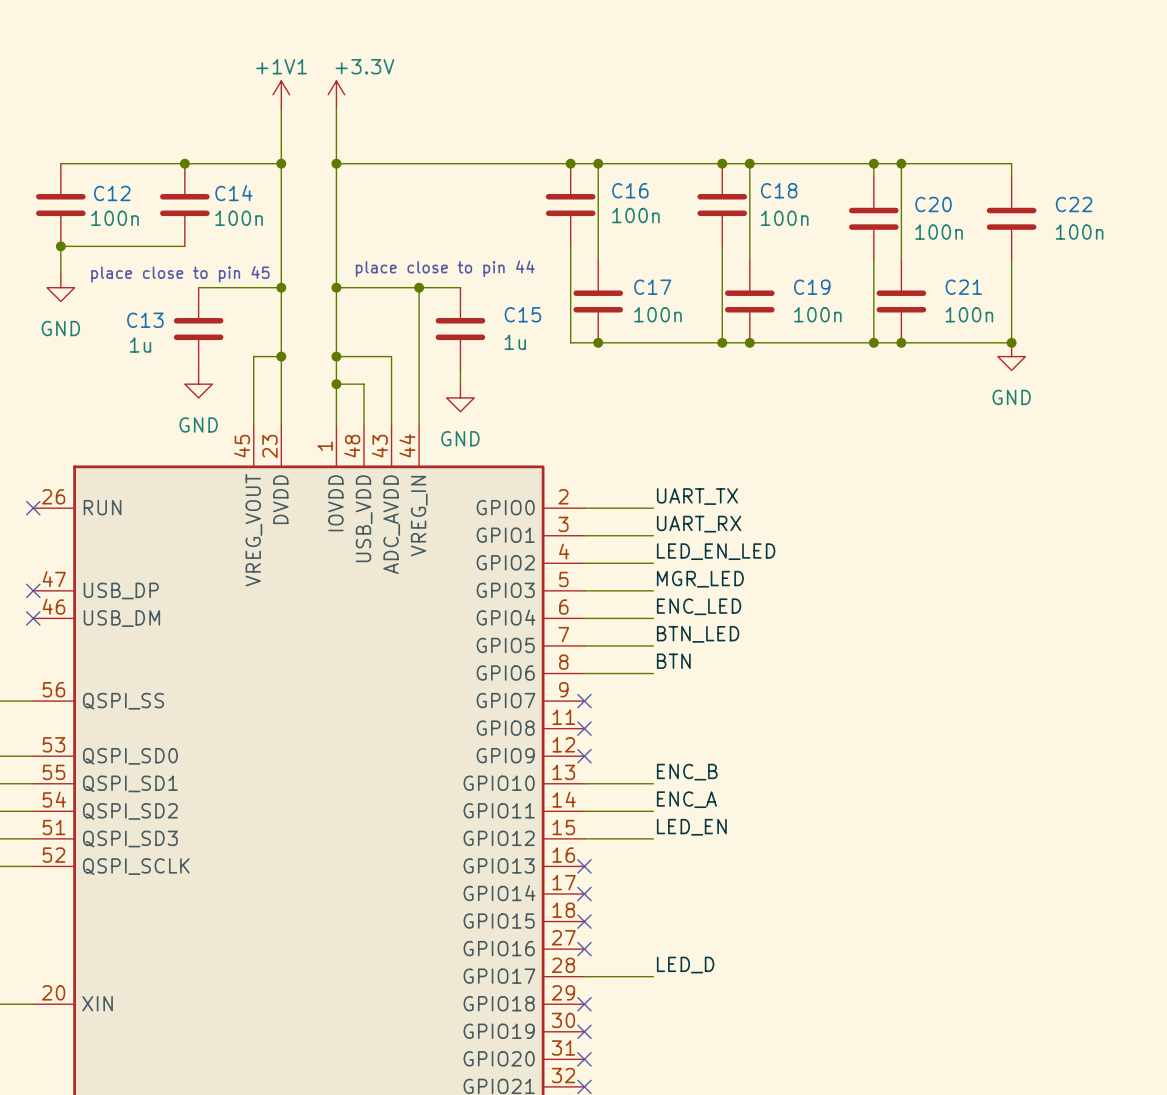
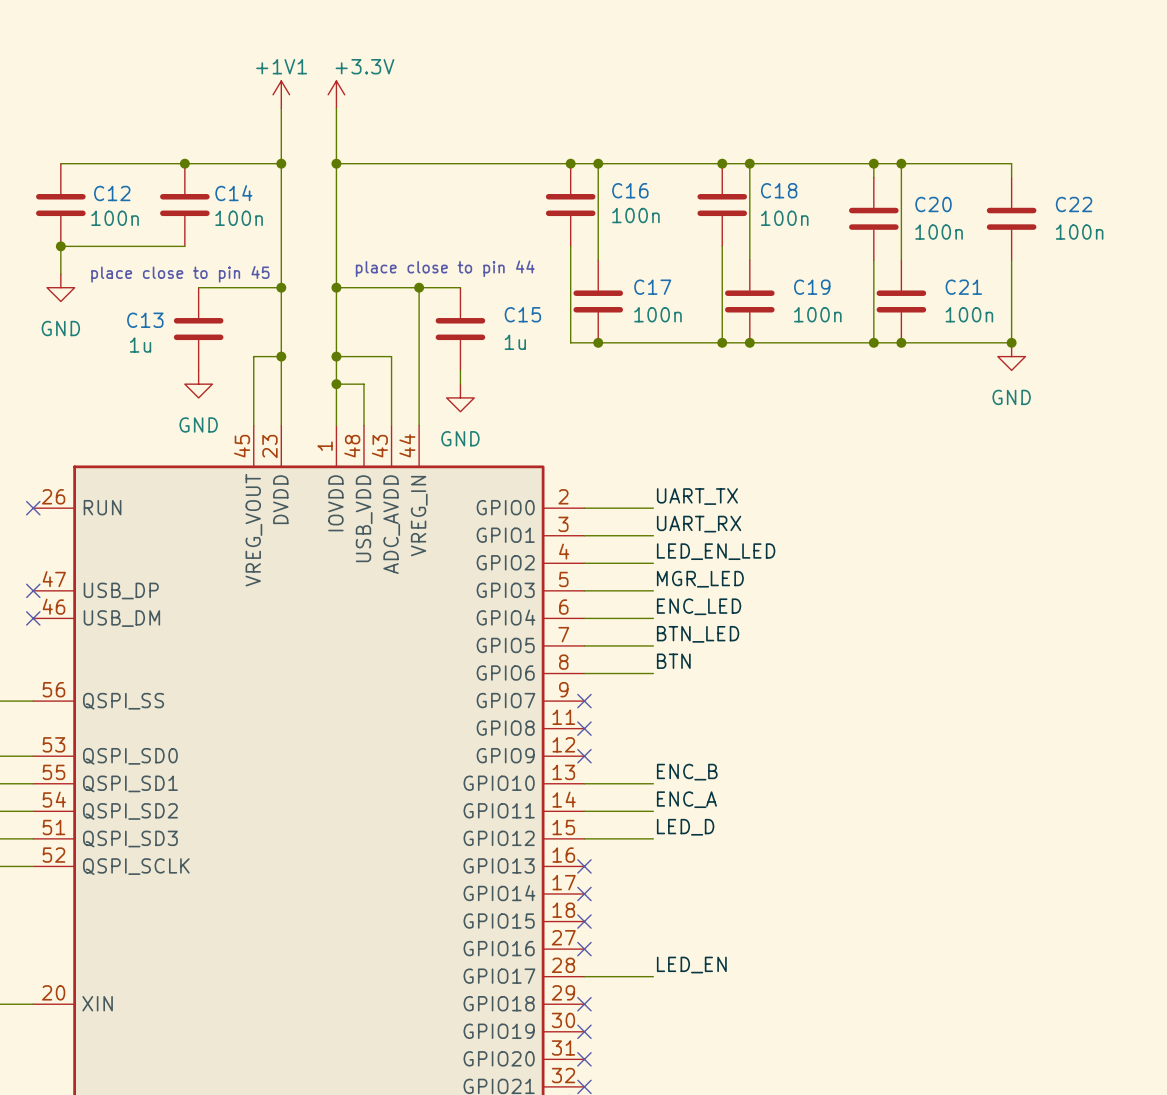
label: LED_EN (691, 827) -> LED_D (685, 827)
label: LED_D (685, 965) -> LED_EN (691, 965)

